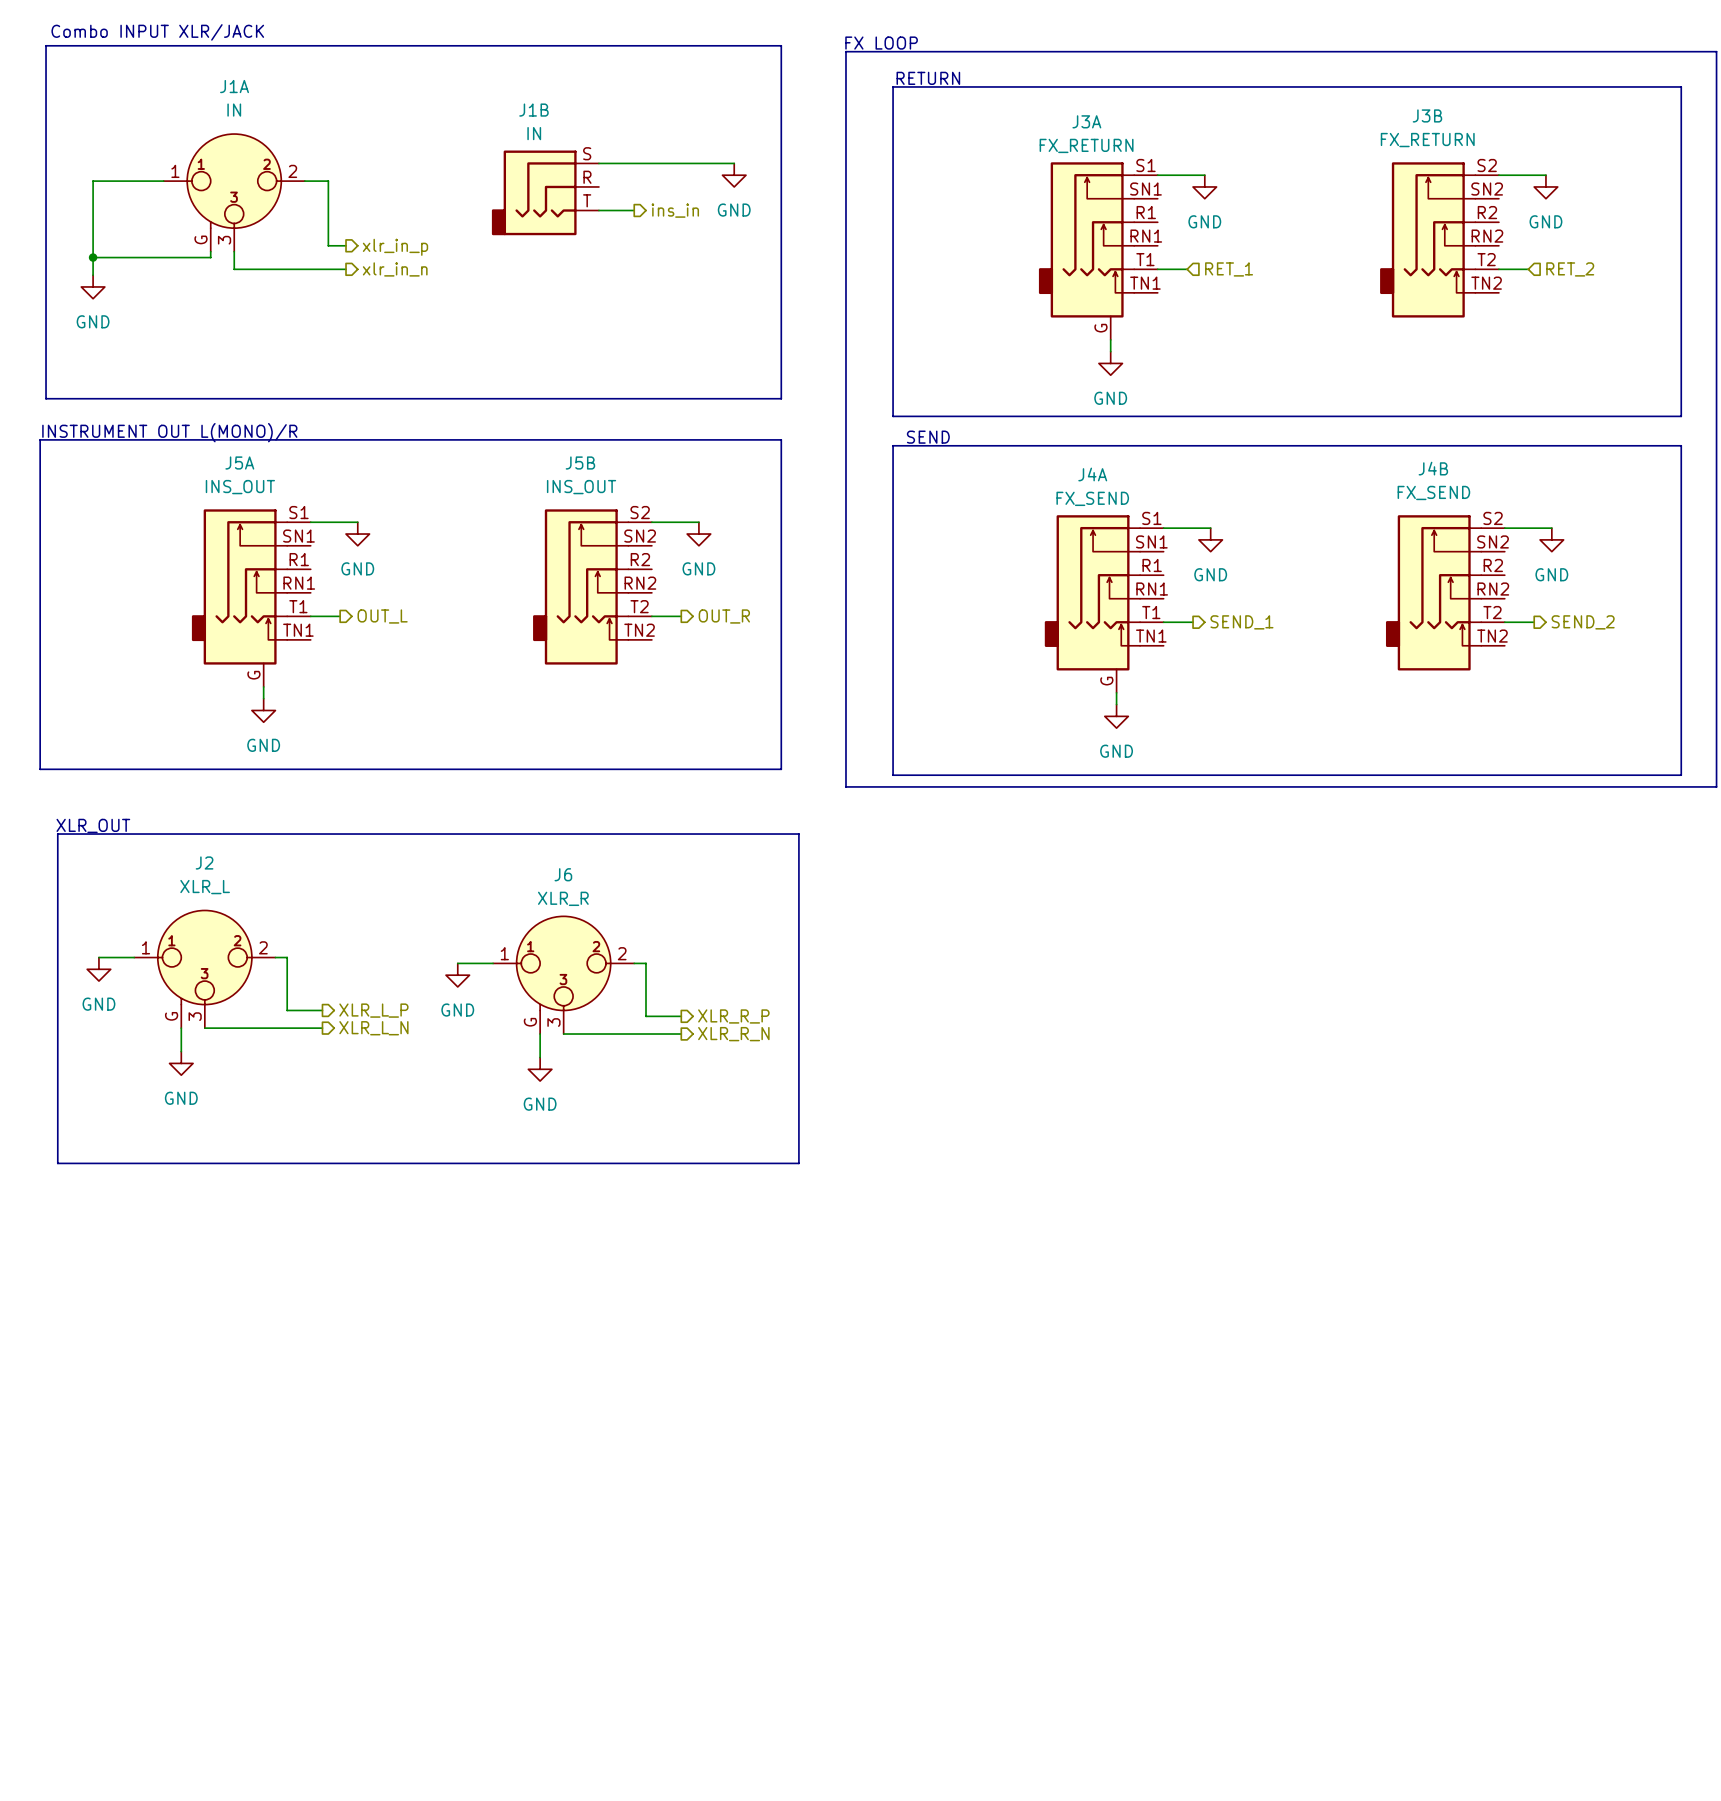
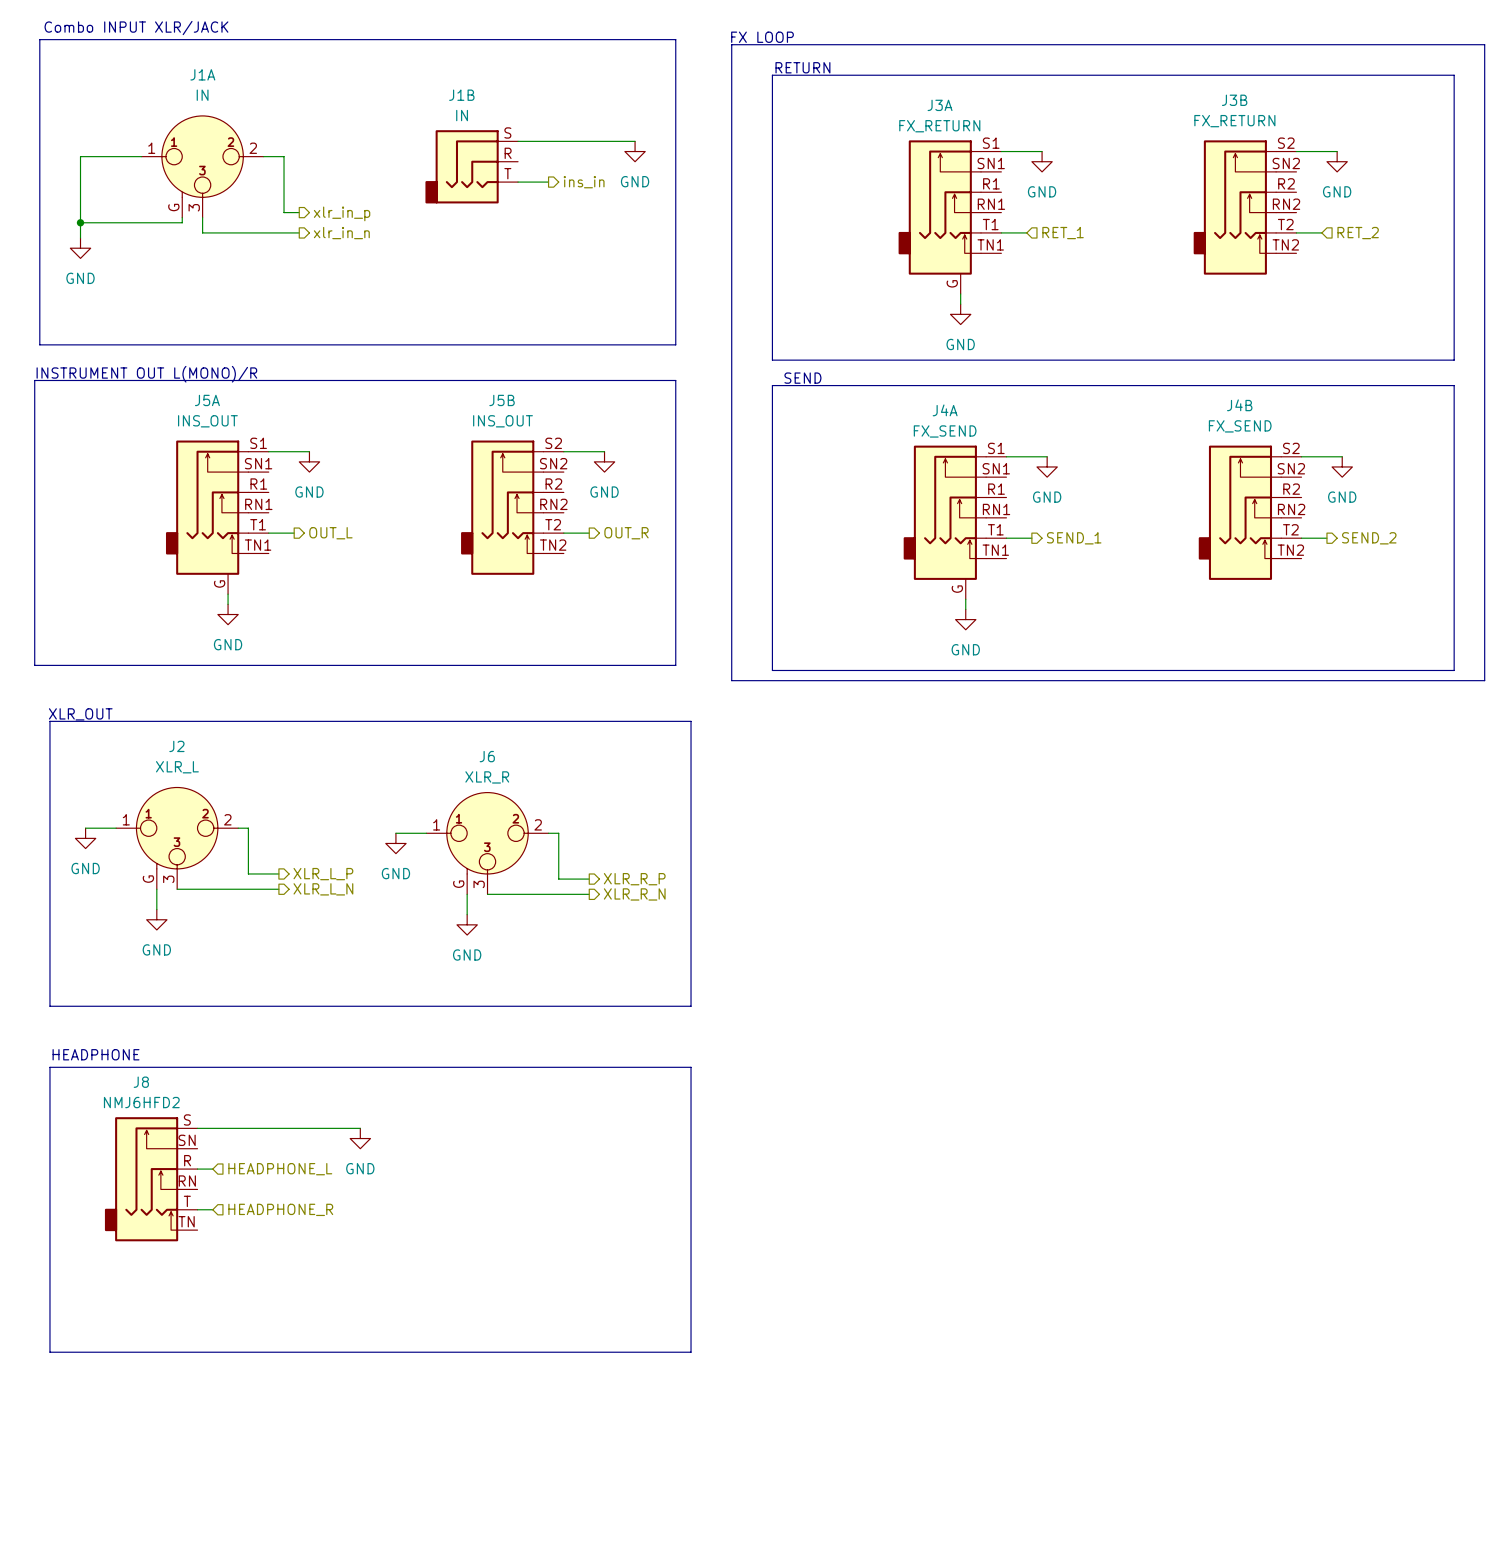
text: none -> HEADPHONE (96, 1054)
line: none -> (49, 1067) (691, 1067) (691, 1352) (49, 1352) (49, 1067)
wire: none -> (197, 1128) (360, 1128)
power symbol: none -> GND (360, 1138)
wire: none -> (197, 1169) (212, 1169)
hierarchical label: none -> HEADPHONE_L (280, 1169)
J8: none -> NMJ6HFD2 (151, 1179)
wire: none -> (197, 1209) (212, 1209)
hierarchical label: none -> HEADPHONE_R (280, 1209)

